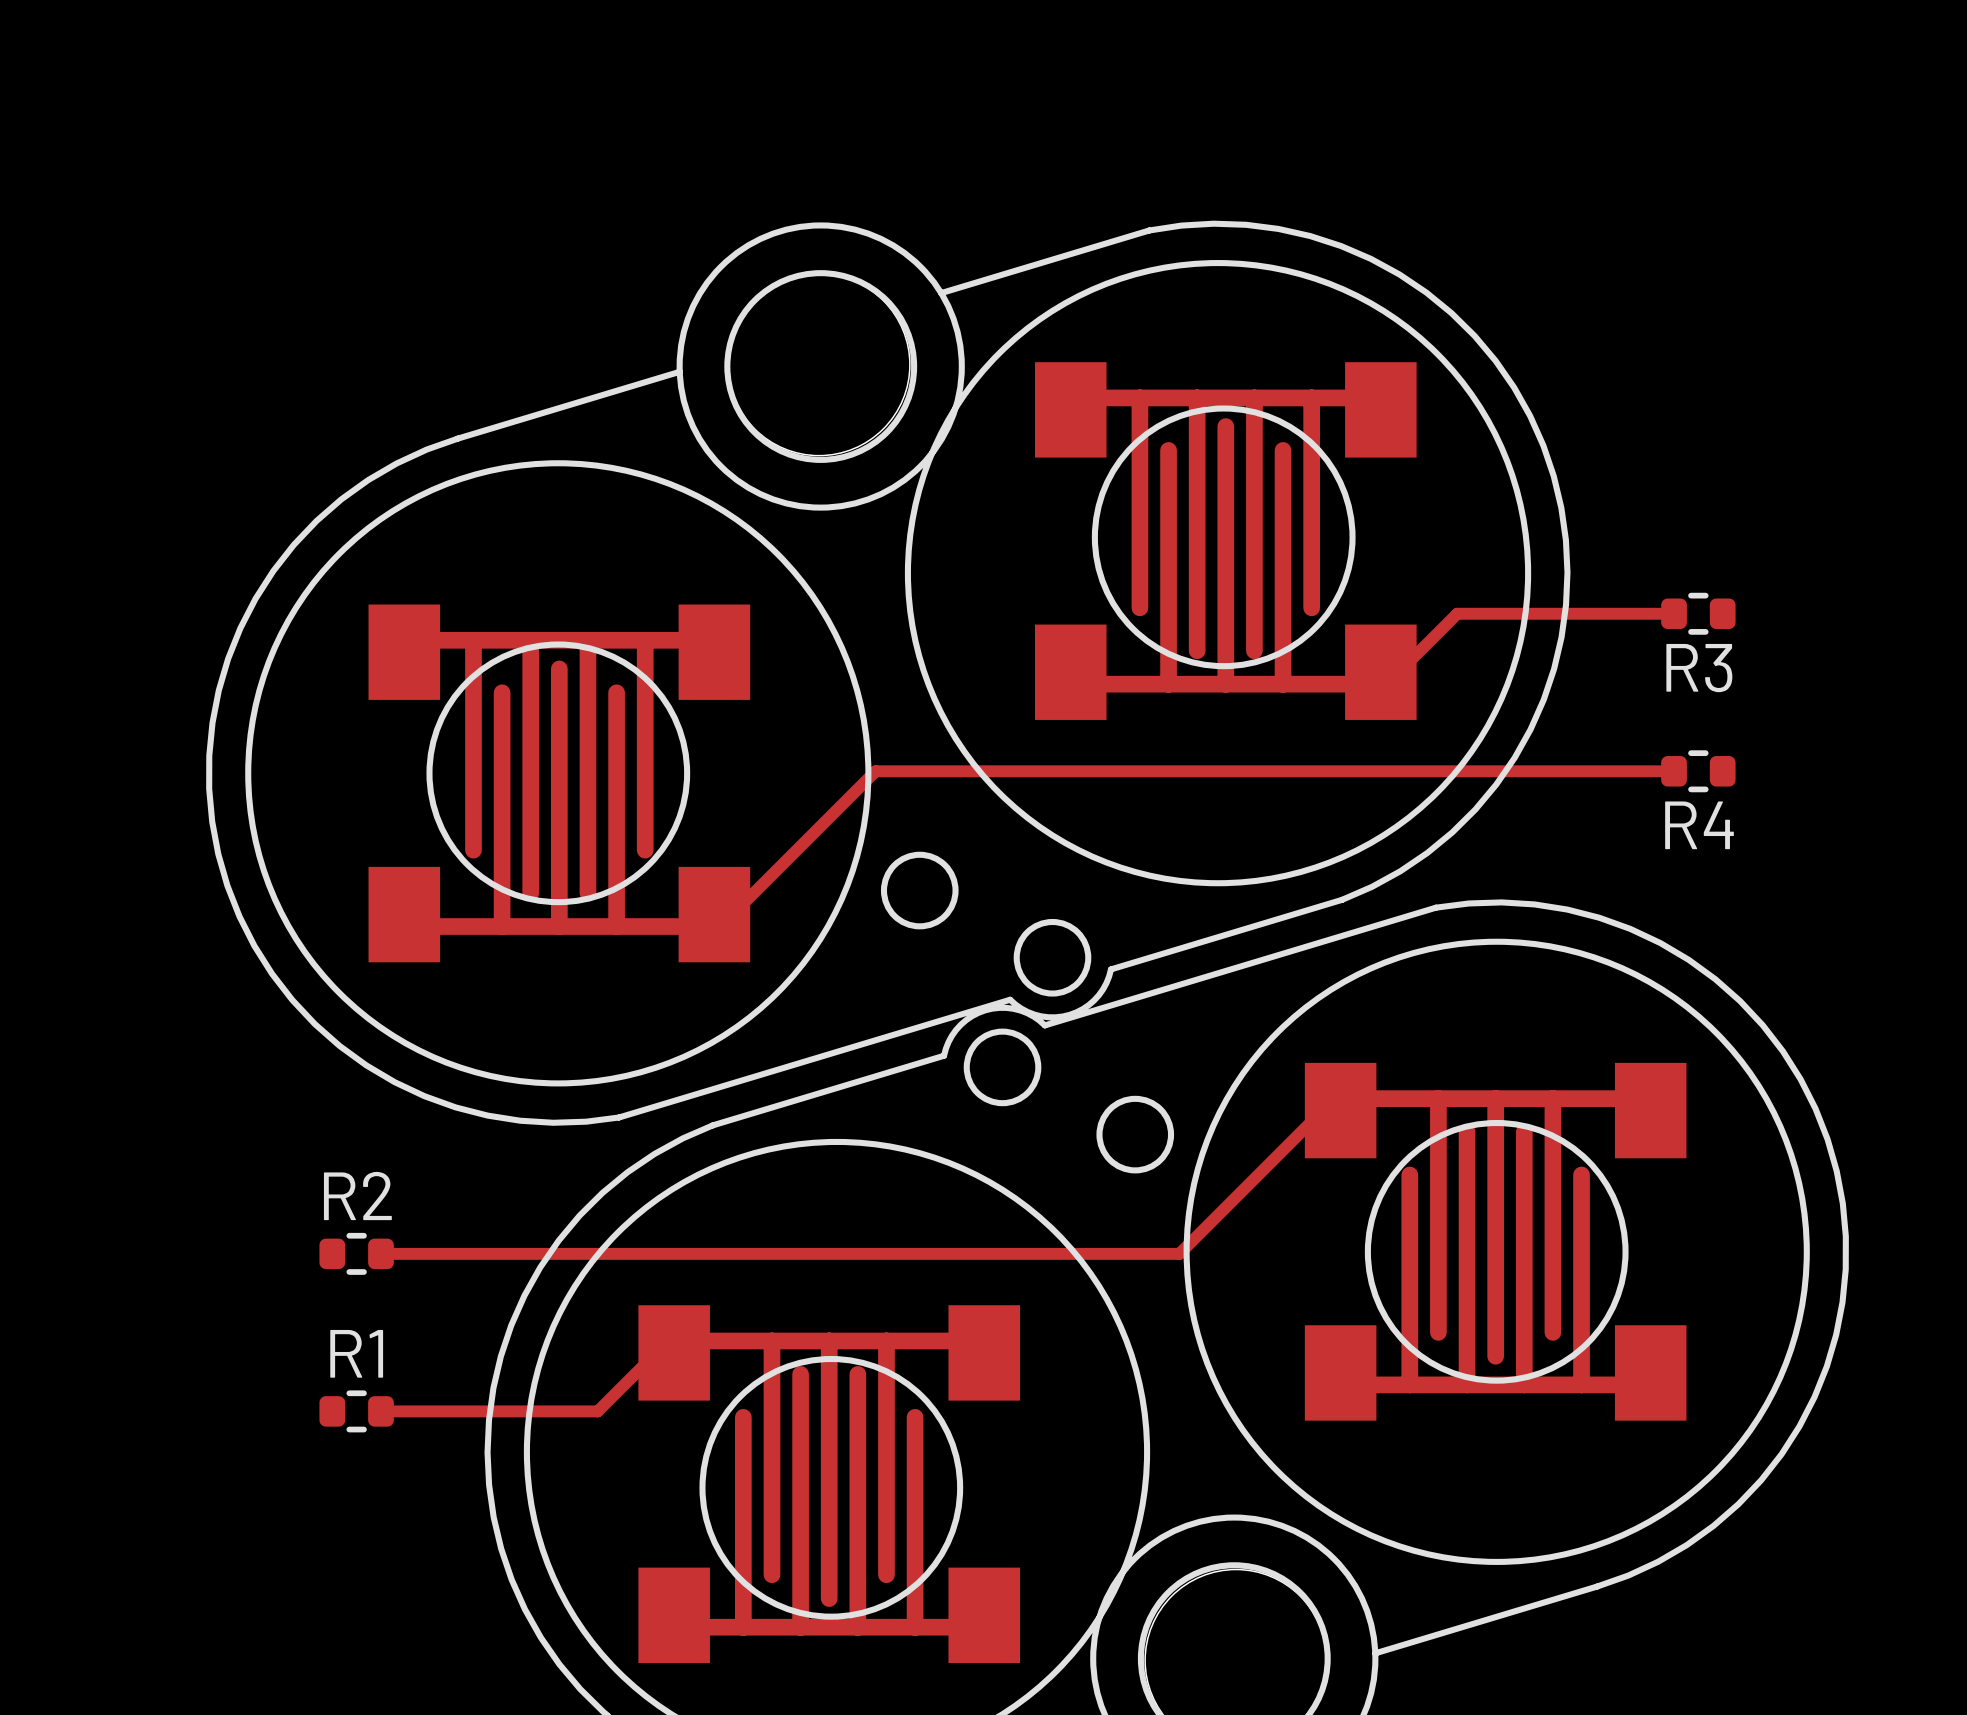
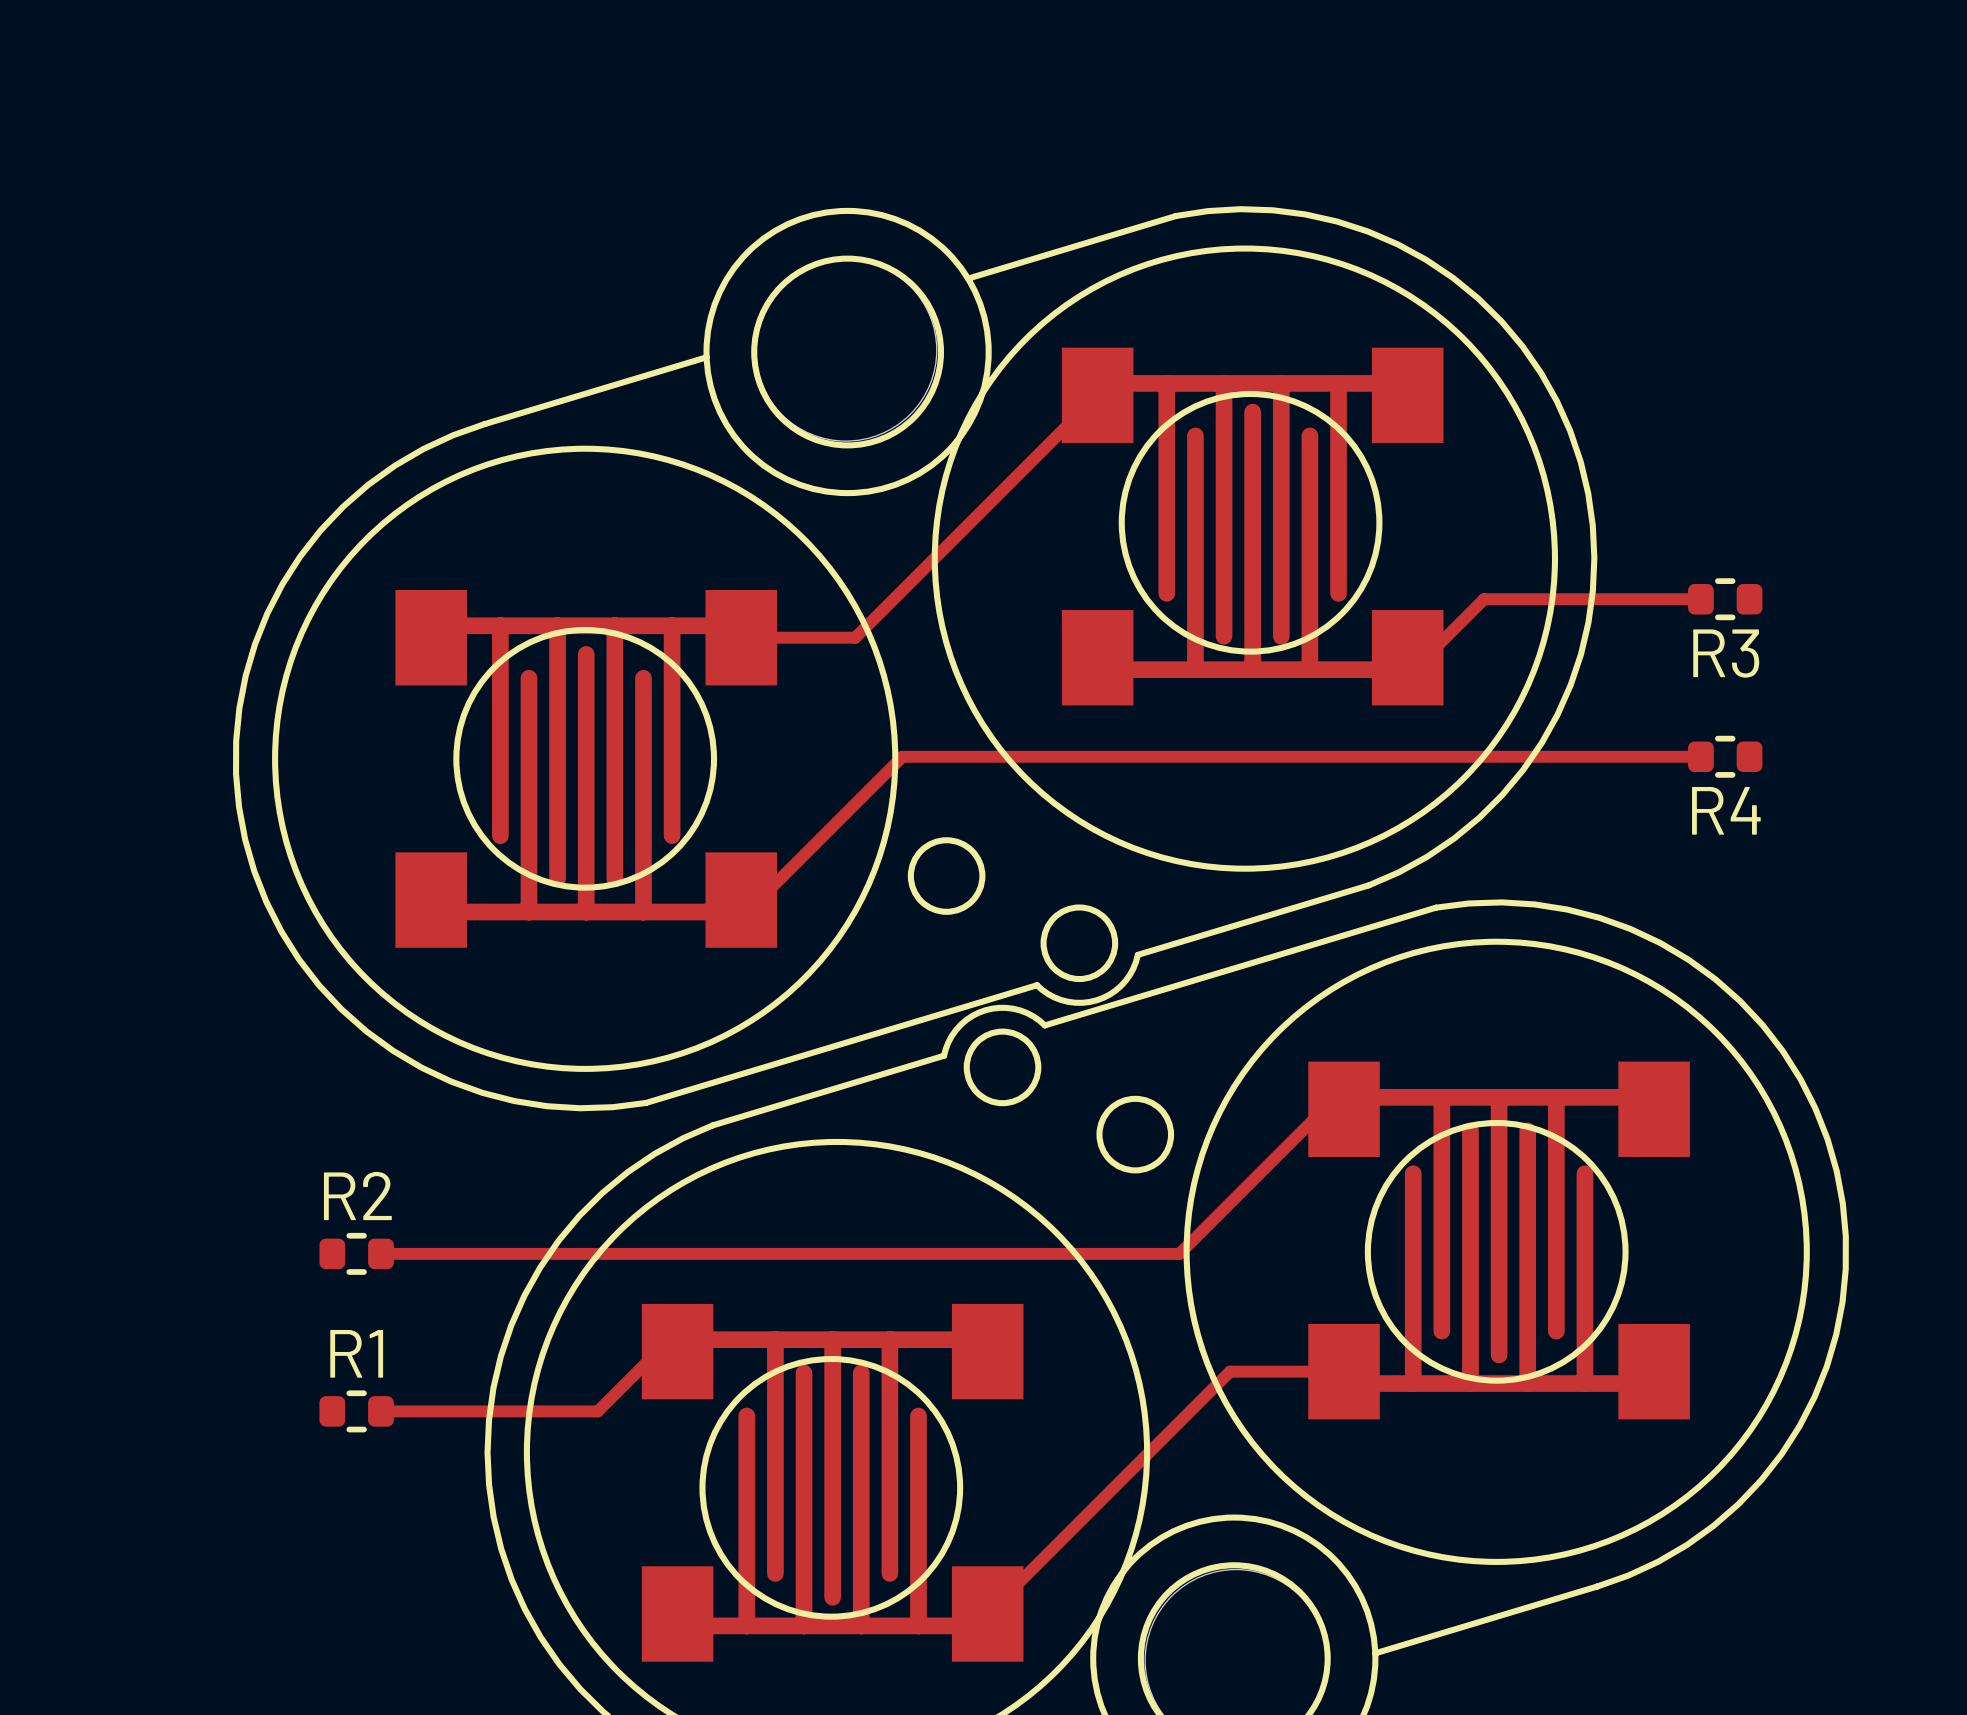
part footprint: [1034, 362, 1417, 720] -> [1061, 347, 1444, 706]
track: none -> (1097, 395) (855, 637) (741, 637)
part footprint: [368, 604, 751, 963] -> [395, 589, 778, 948]
track: (1674, 613) (1457, 613) (1398, 672) -> (1700, 599) (1484, 599) (1425, 657)
R3 position: (1698, 613) -> (1725, 599)
part position: (888, 673) -> (915, 658)
track: (1674, 771) (875, 771) (732, 914) -> (1700, 756) (902, 756) (759, 900)
R4 position: (1698, 771) -> (1725, 756)
part footprint: [1304, 1062, 1687, 1421] -> [1308, 1061, 1690, 1420]
part footprint: [638, 1305, 1021, 1664] -> [641, 1303, 1024, 1662]
track: none -> (1344, 1371) (1230, 1371) (987, 1613)

